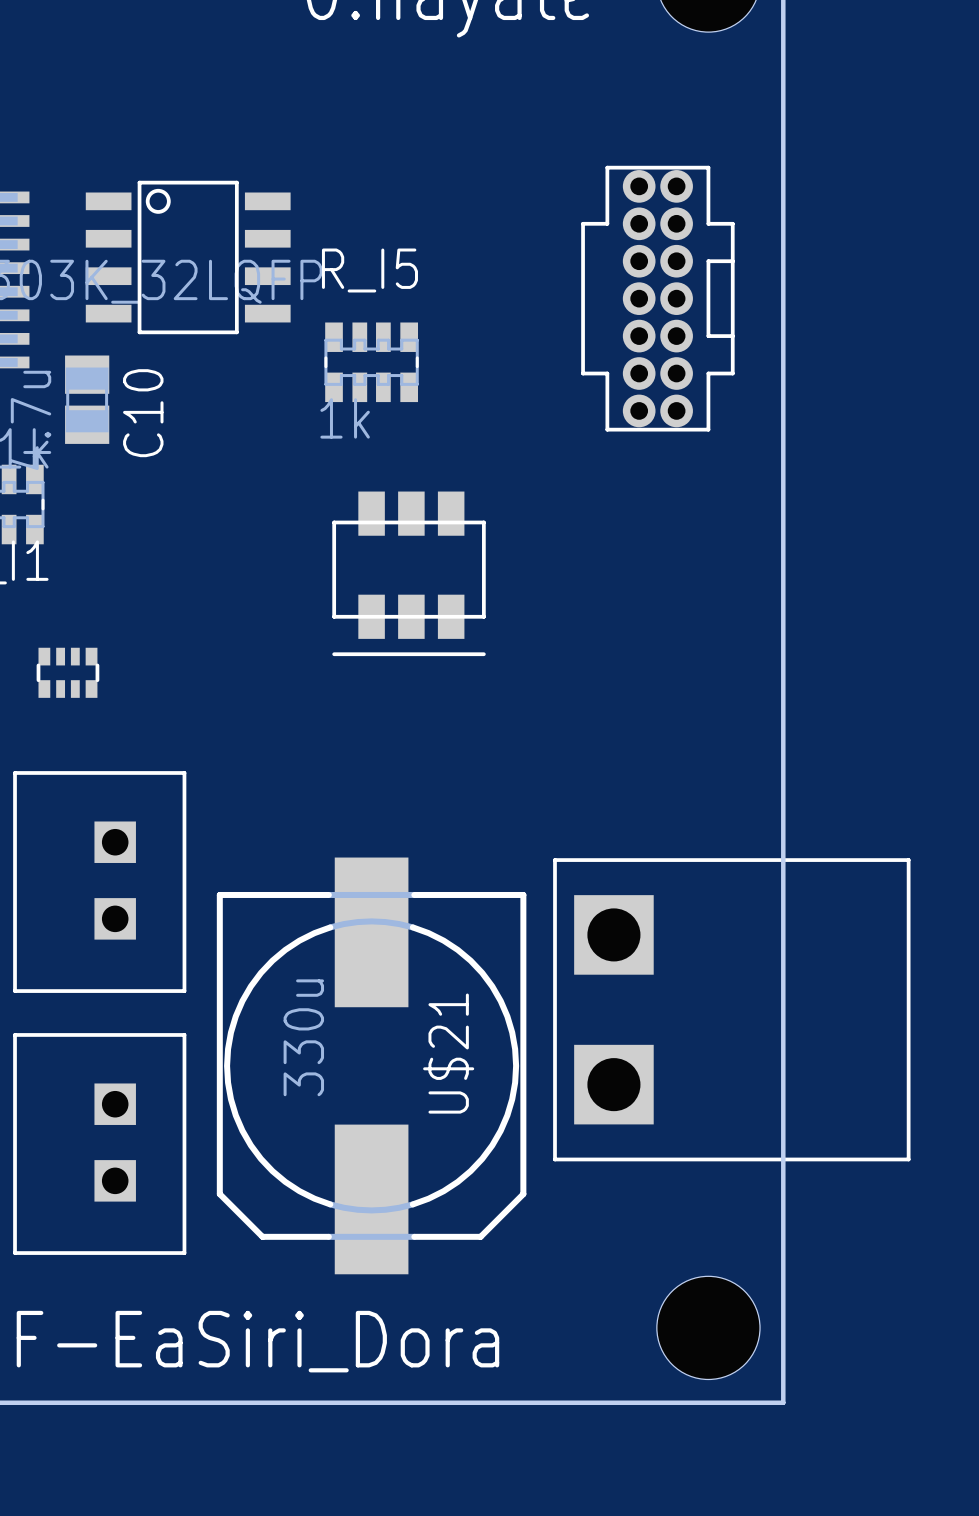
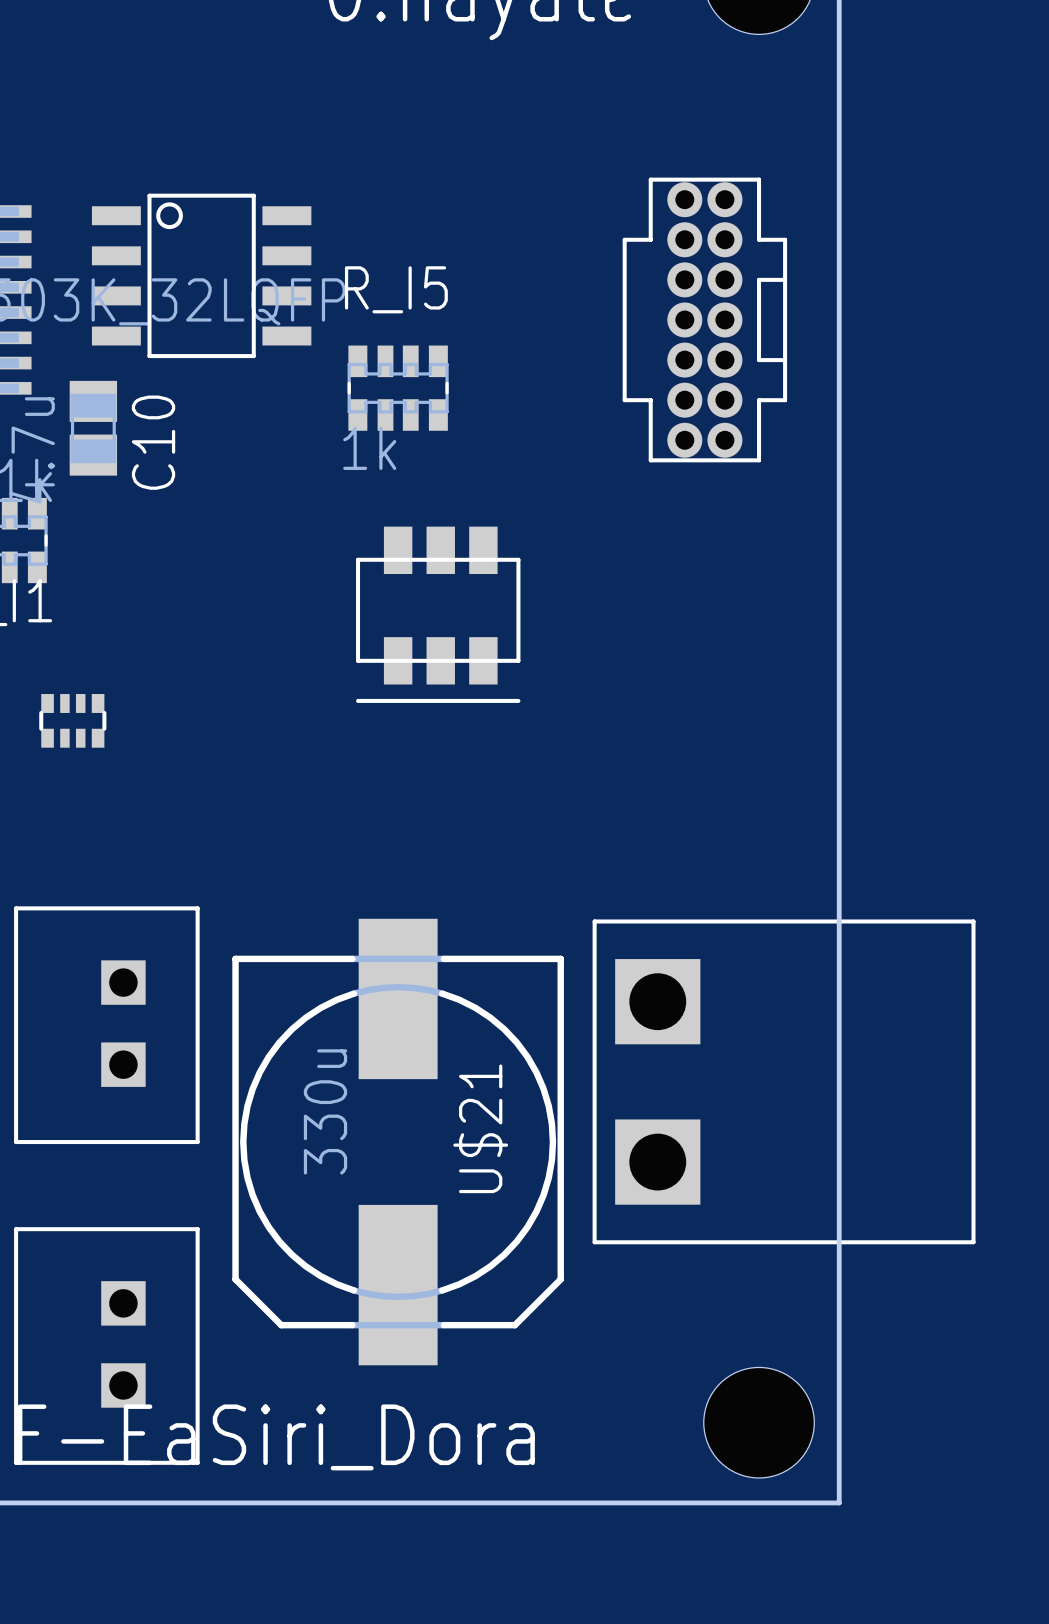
part position: (99, 882) -> (106, 1025)
part: (99, 1144) -> none
part: none -> (106, 1346)

